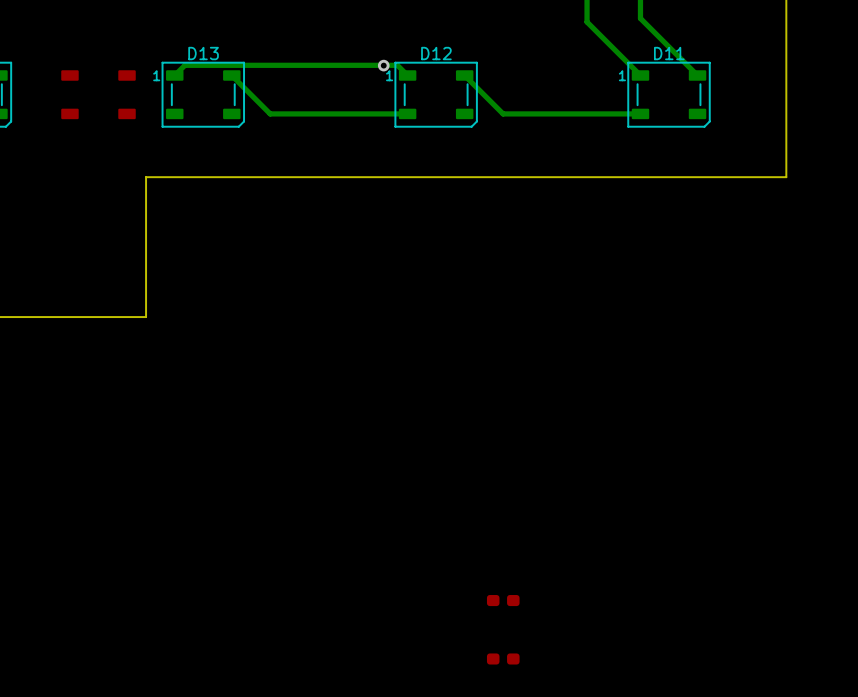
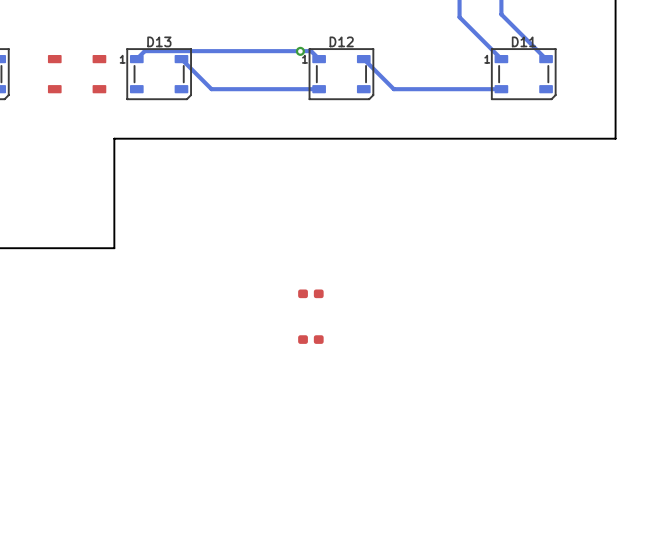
part: none -> (310, 293)
part: none -> (310, 339)
part: (503, 600) -> none
part: (503, 658) -> none

